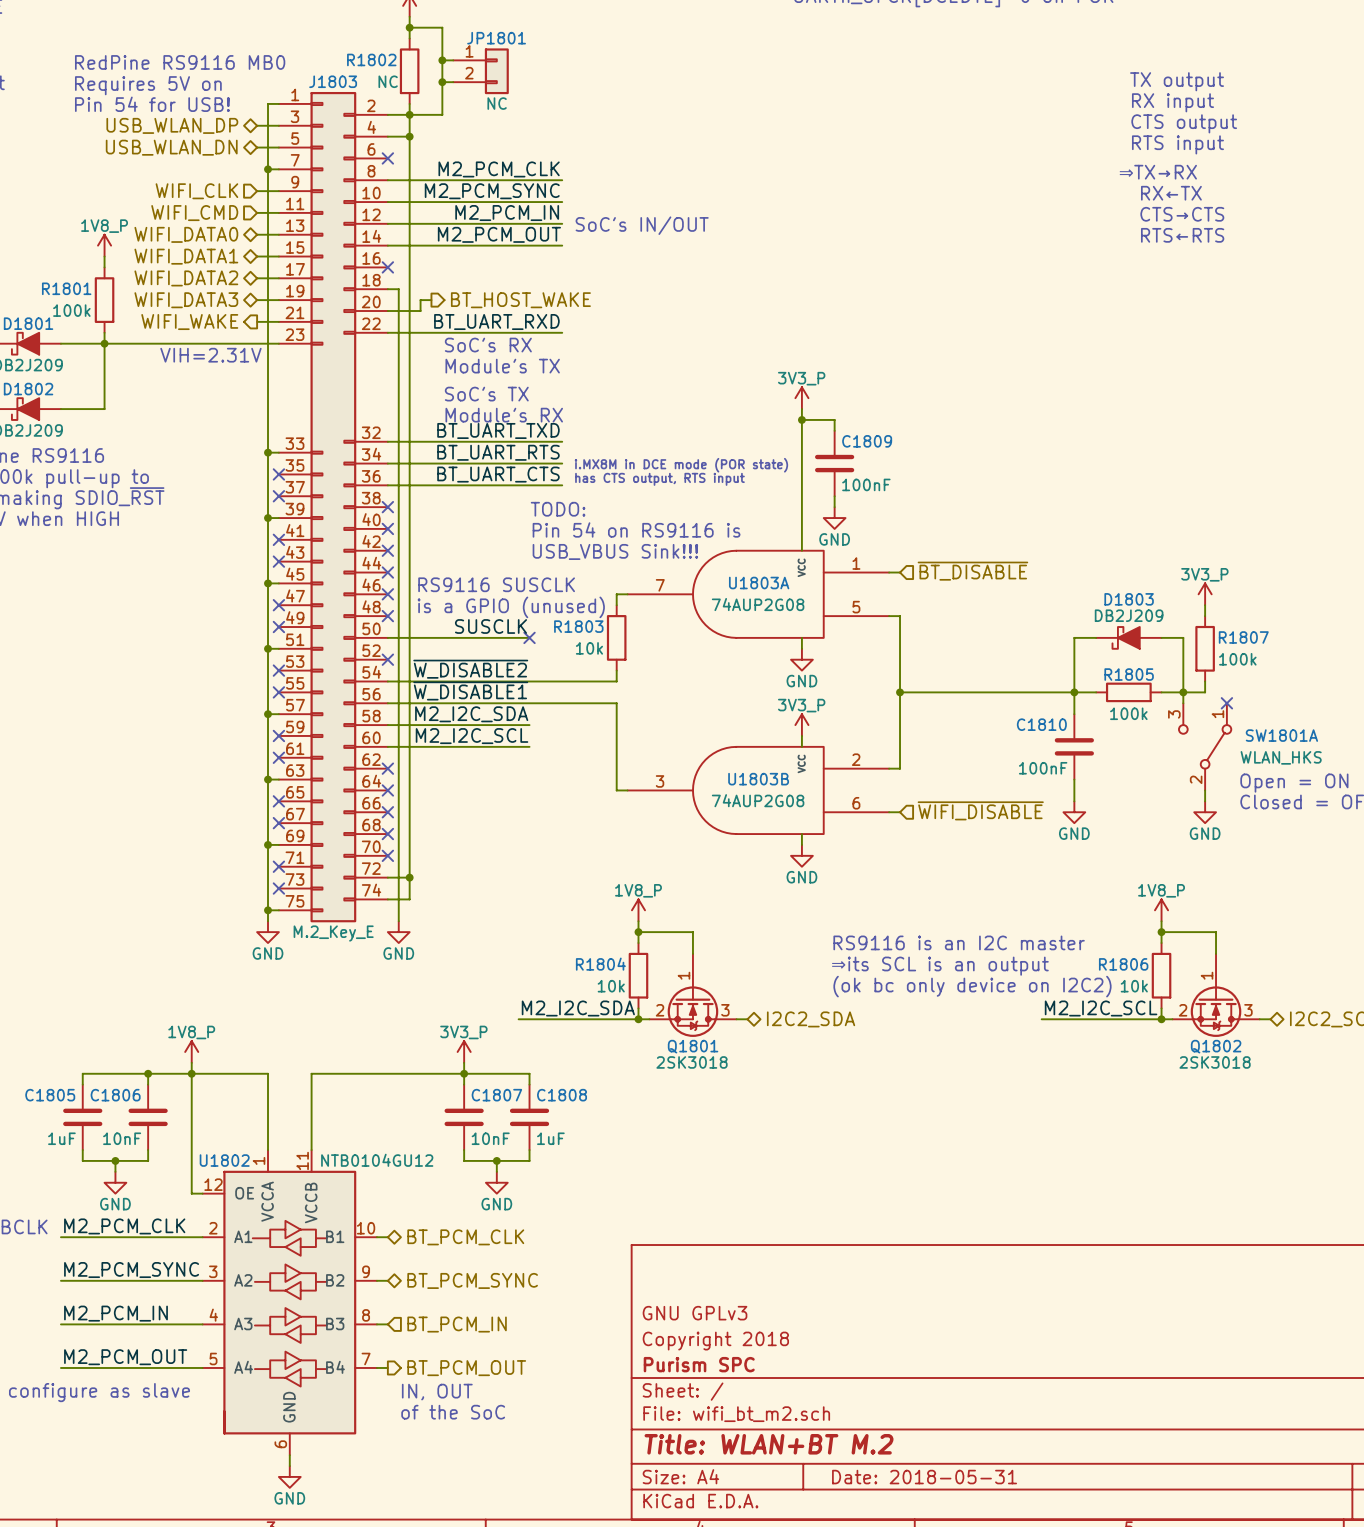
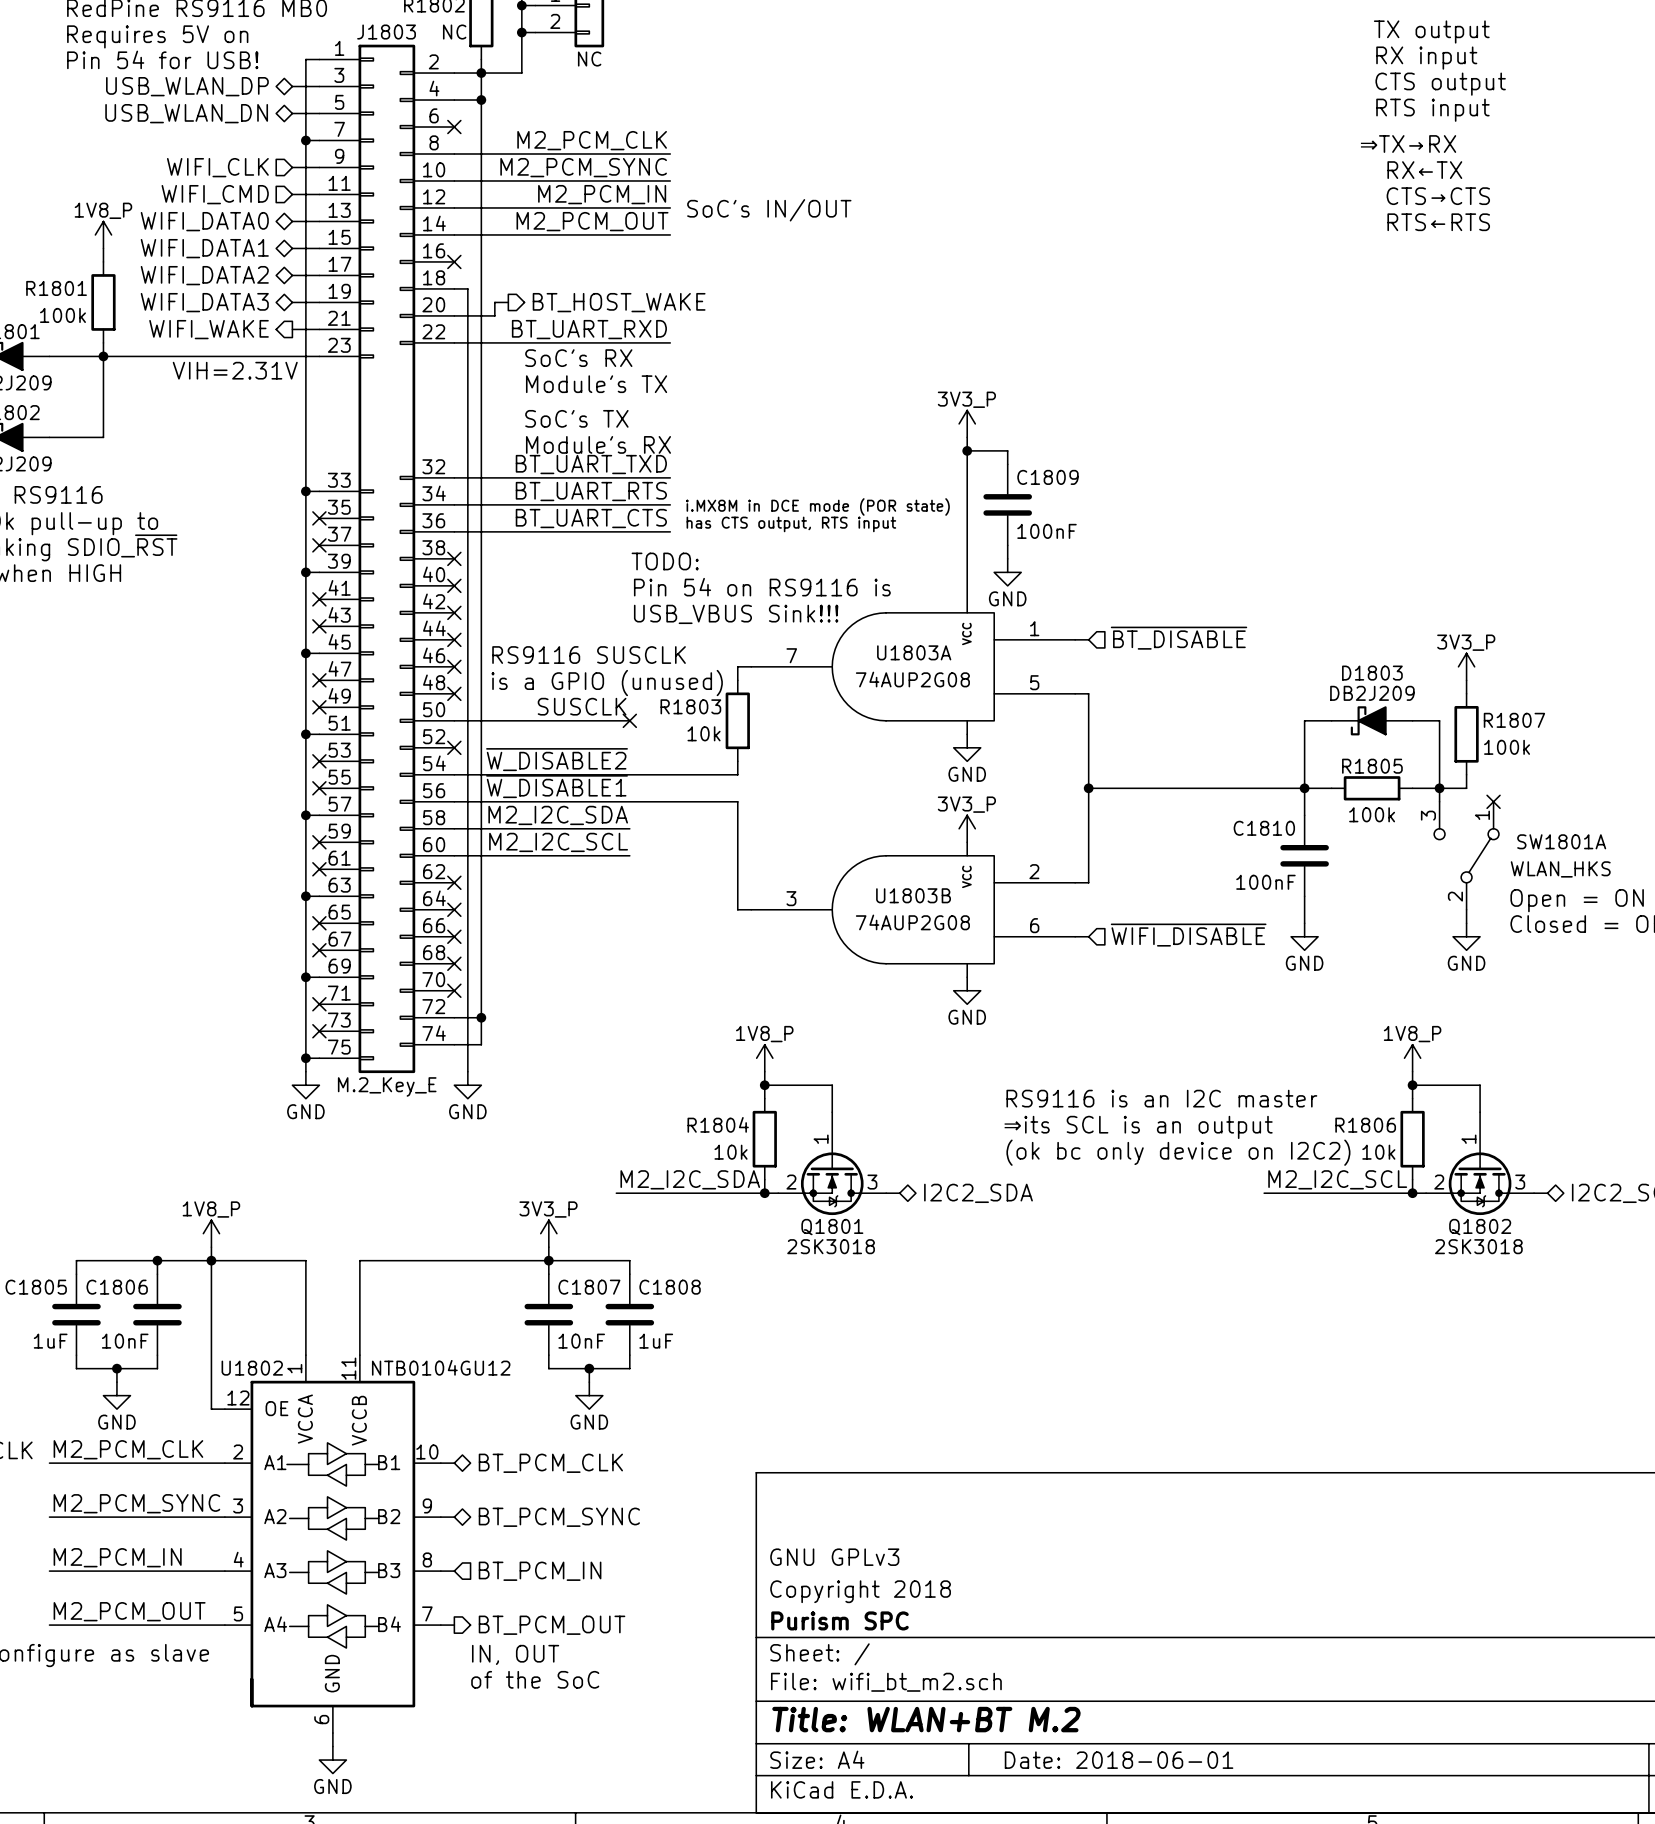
title block: Date: 2018-05-31 (924, 1477) -> Date: 2018-06-01 (1119, 1760)

